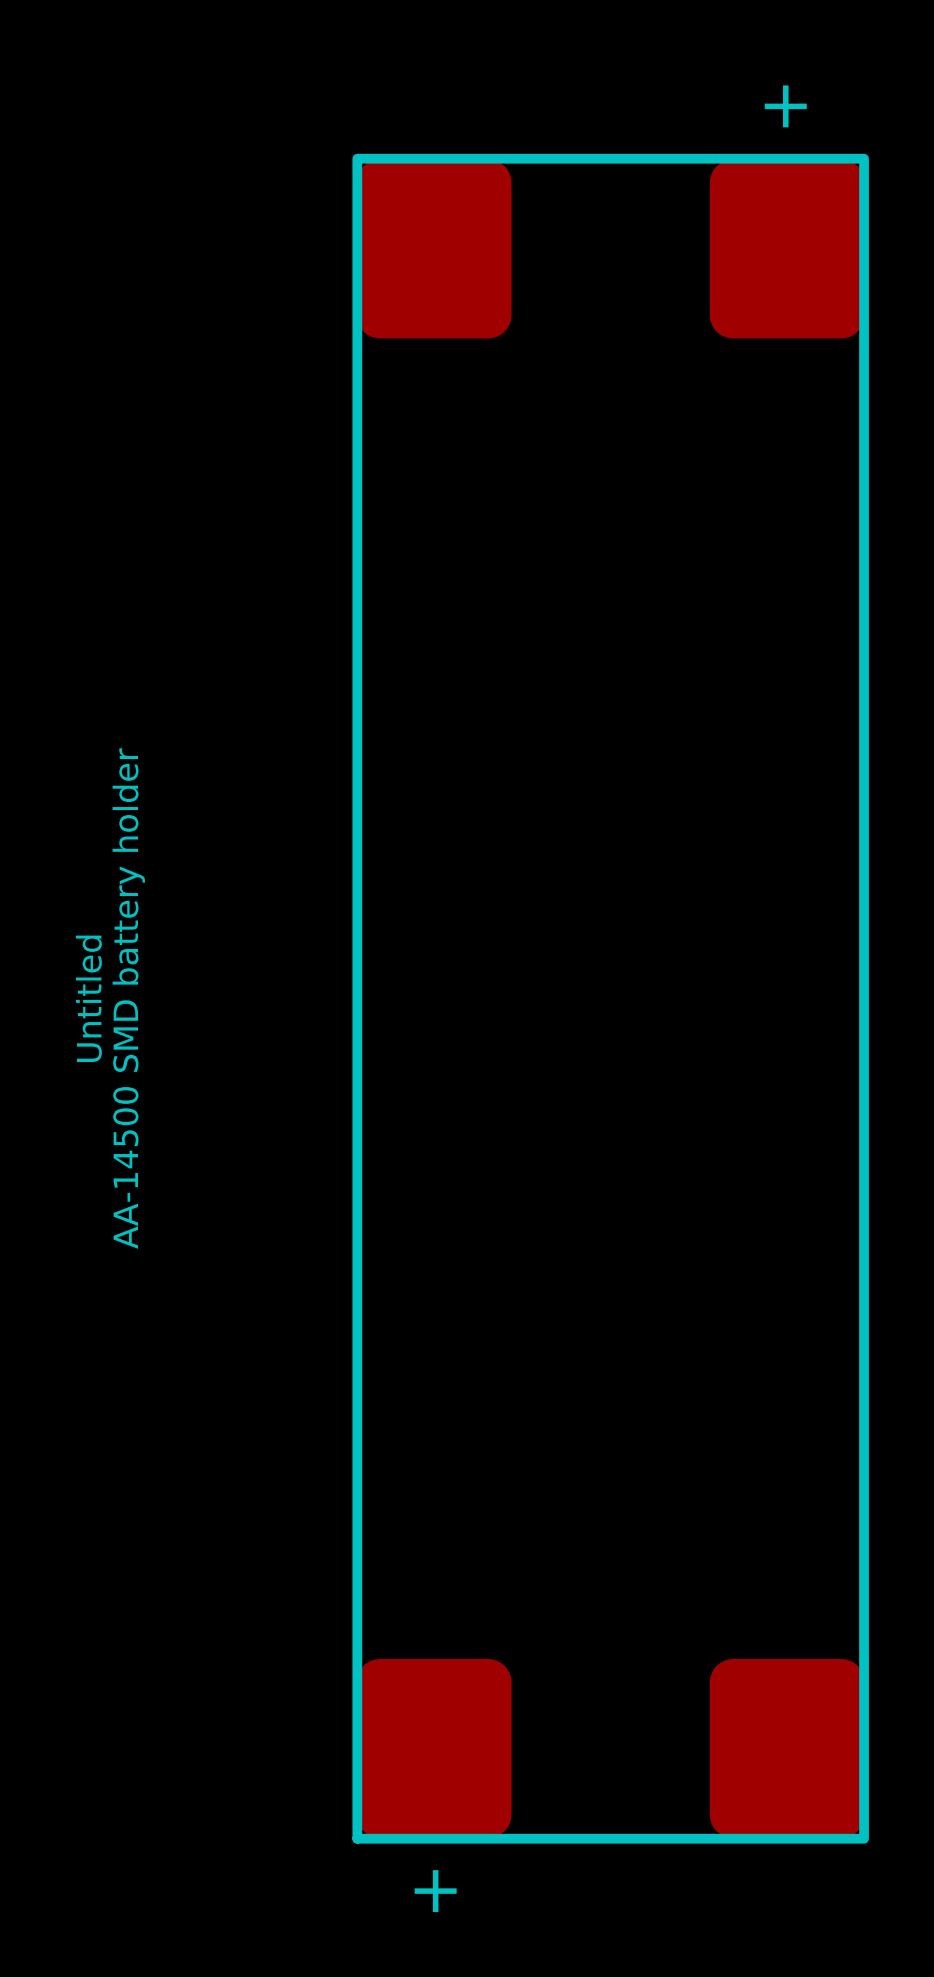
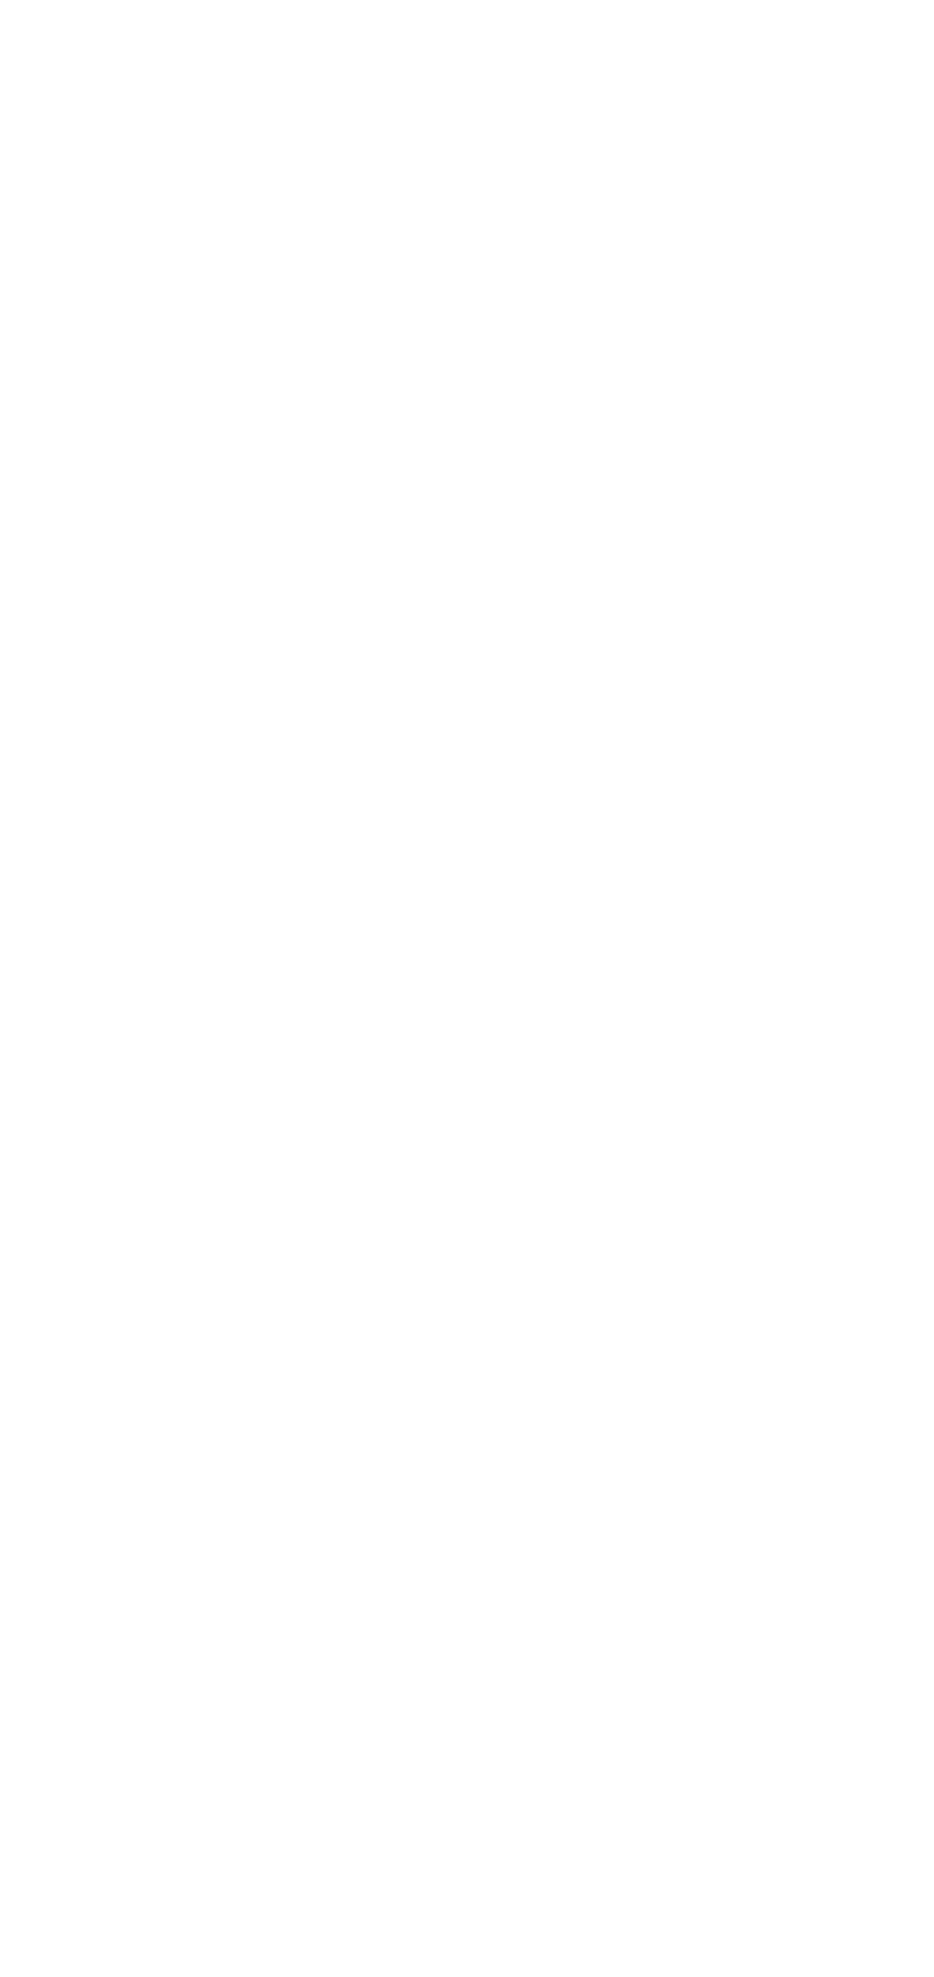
Untitled: AA-14500 SMD battery holder (610, 998) -> none

